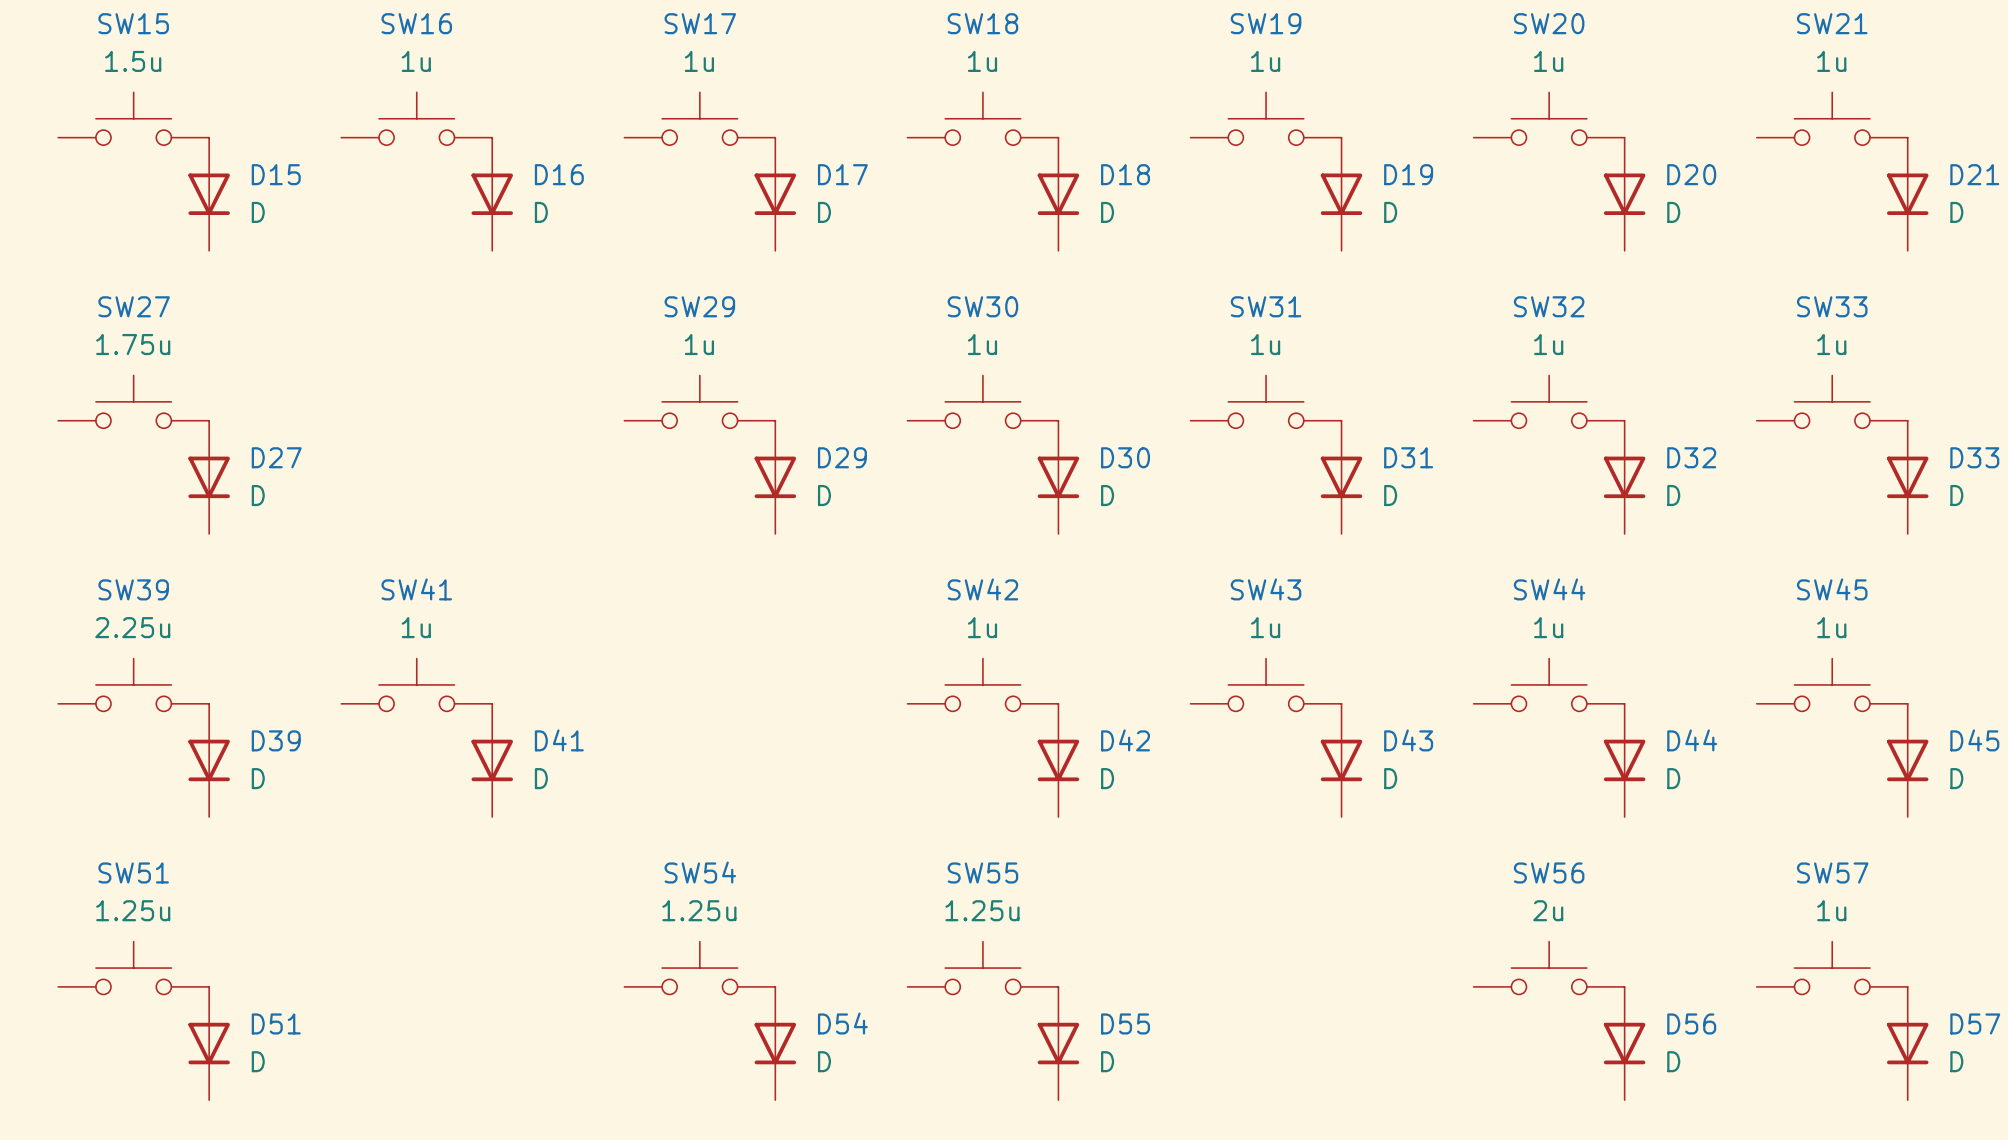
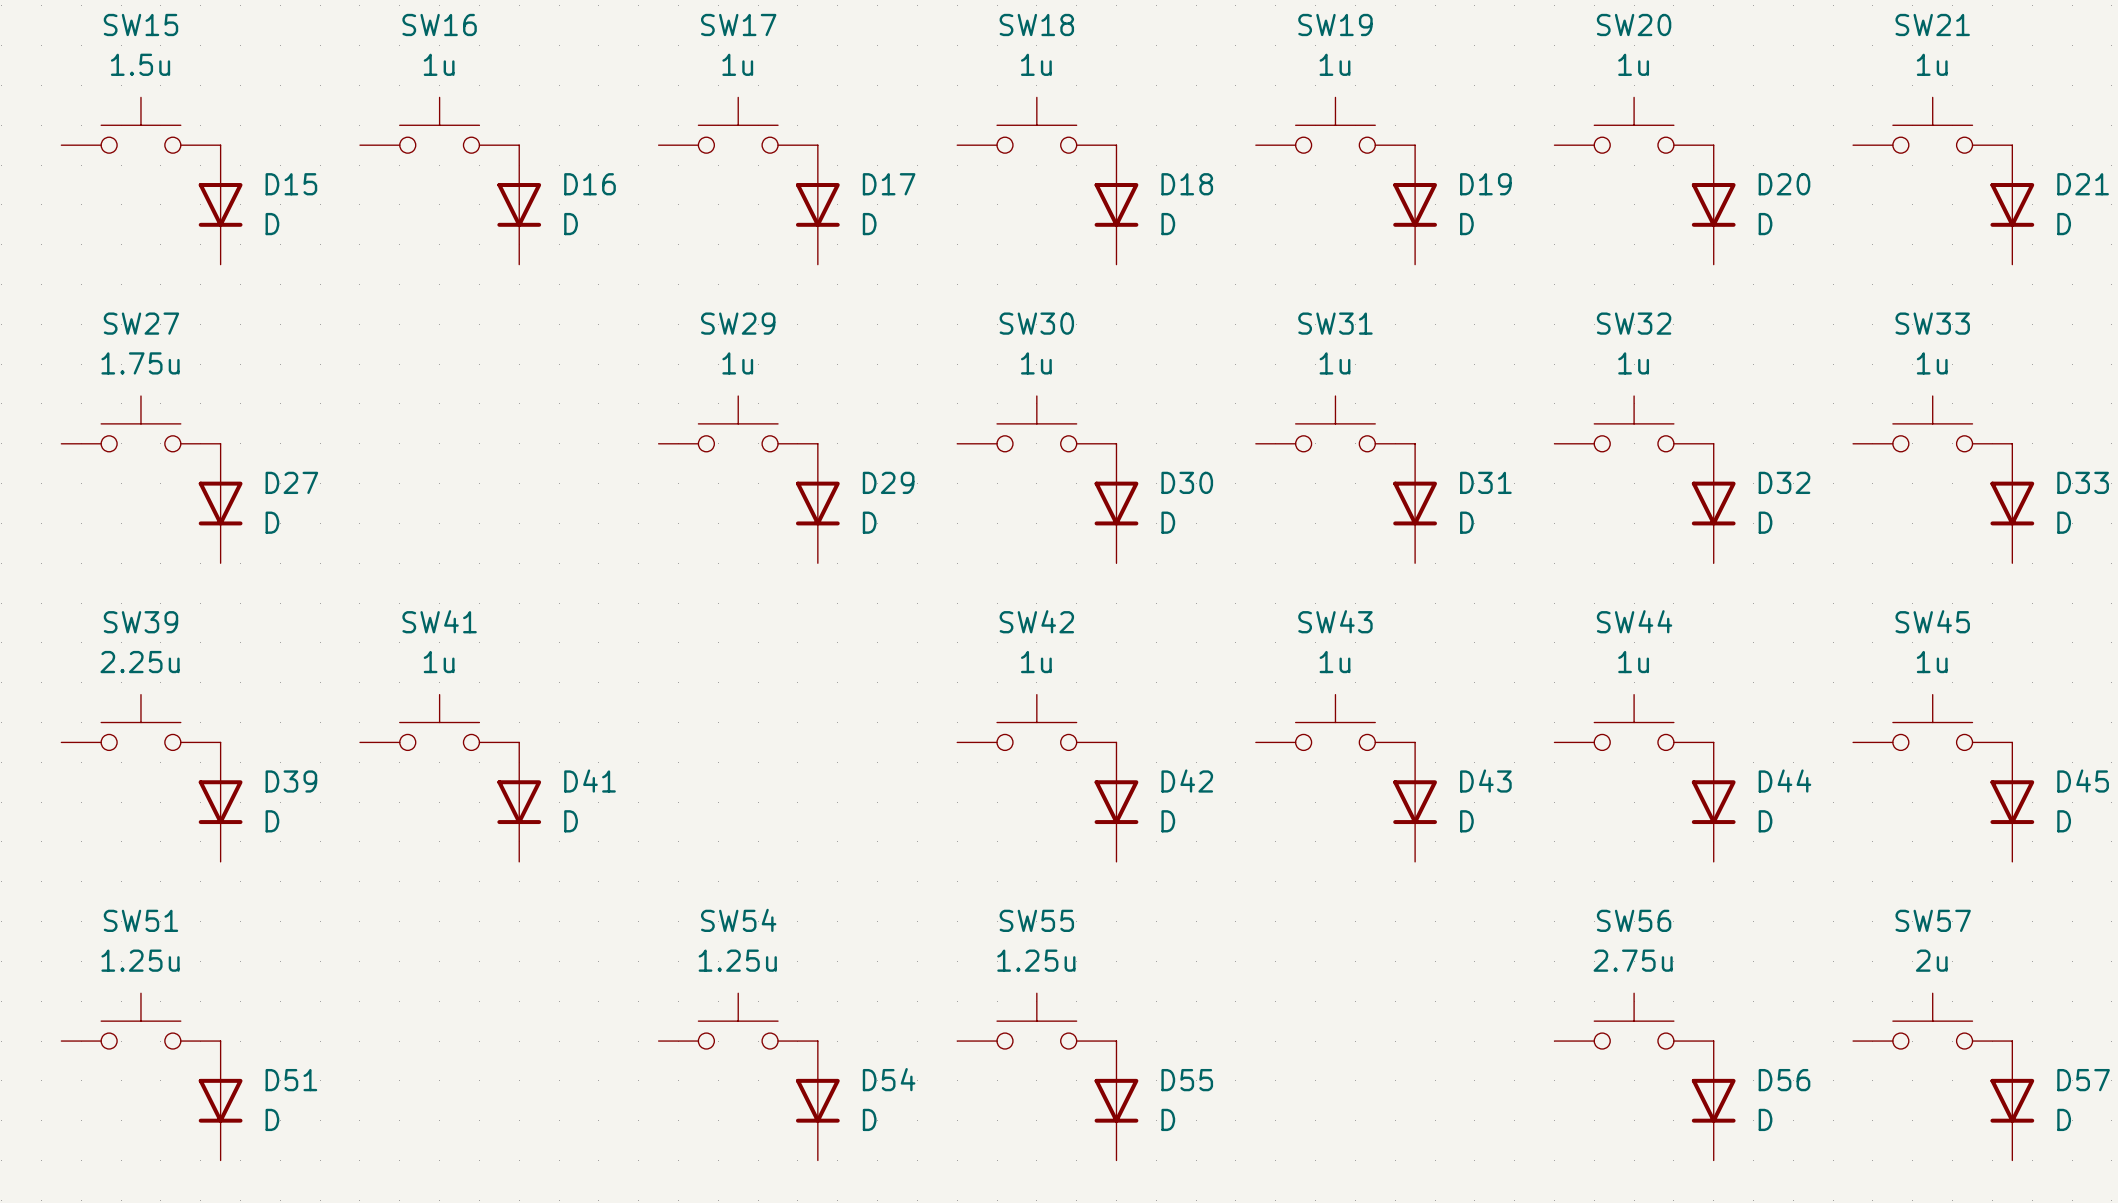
SW56 value: 2u (1548, 910) -> 2.75u (1633, 960)
SW57 value: 1u (1831, 910) -> 2u (1931, 960)

